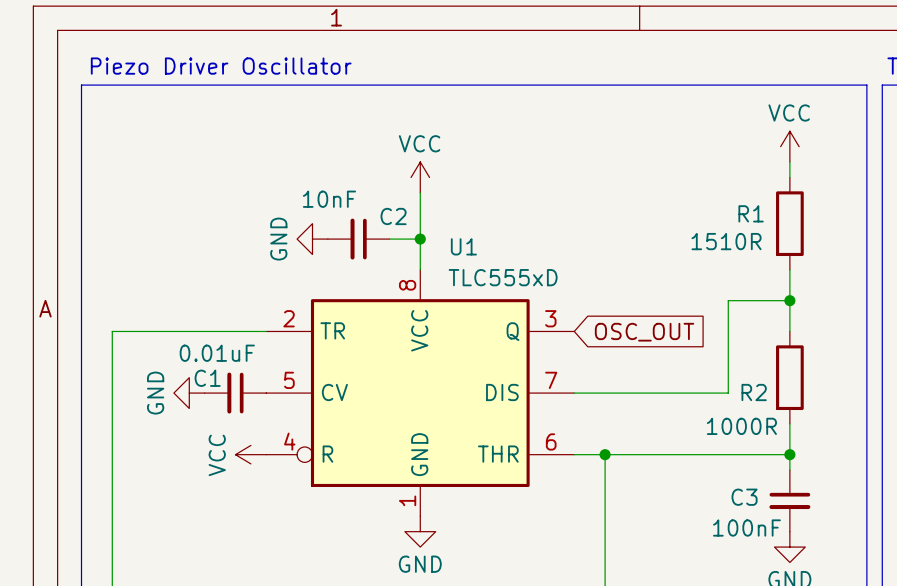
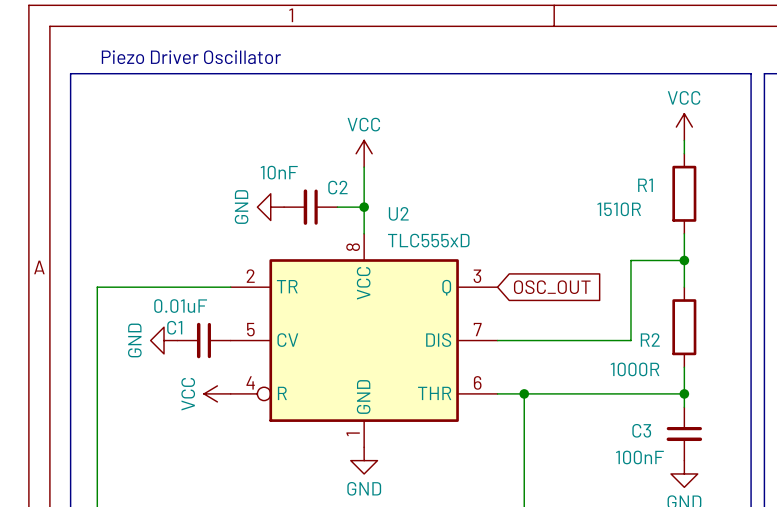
U1 name: U1 (463, 246) -> U2 (398, 213)

